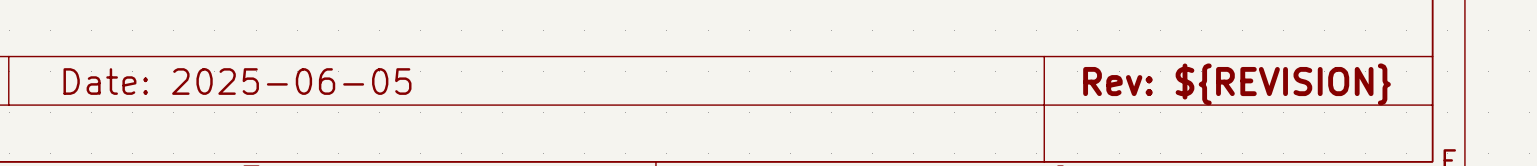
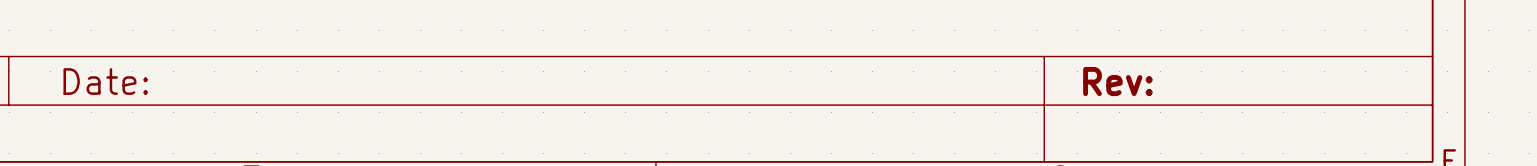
title block: Date: 2025-06-05 (237, 81) -> Date: (105, 81)
title block: Rev: ${REVISION} (1236, 84) -> Rev: (1117, 81)

